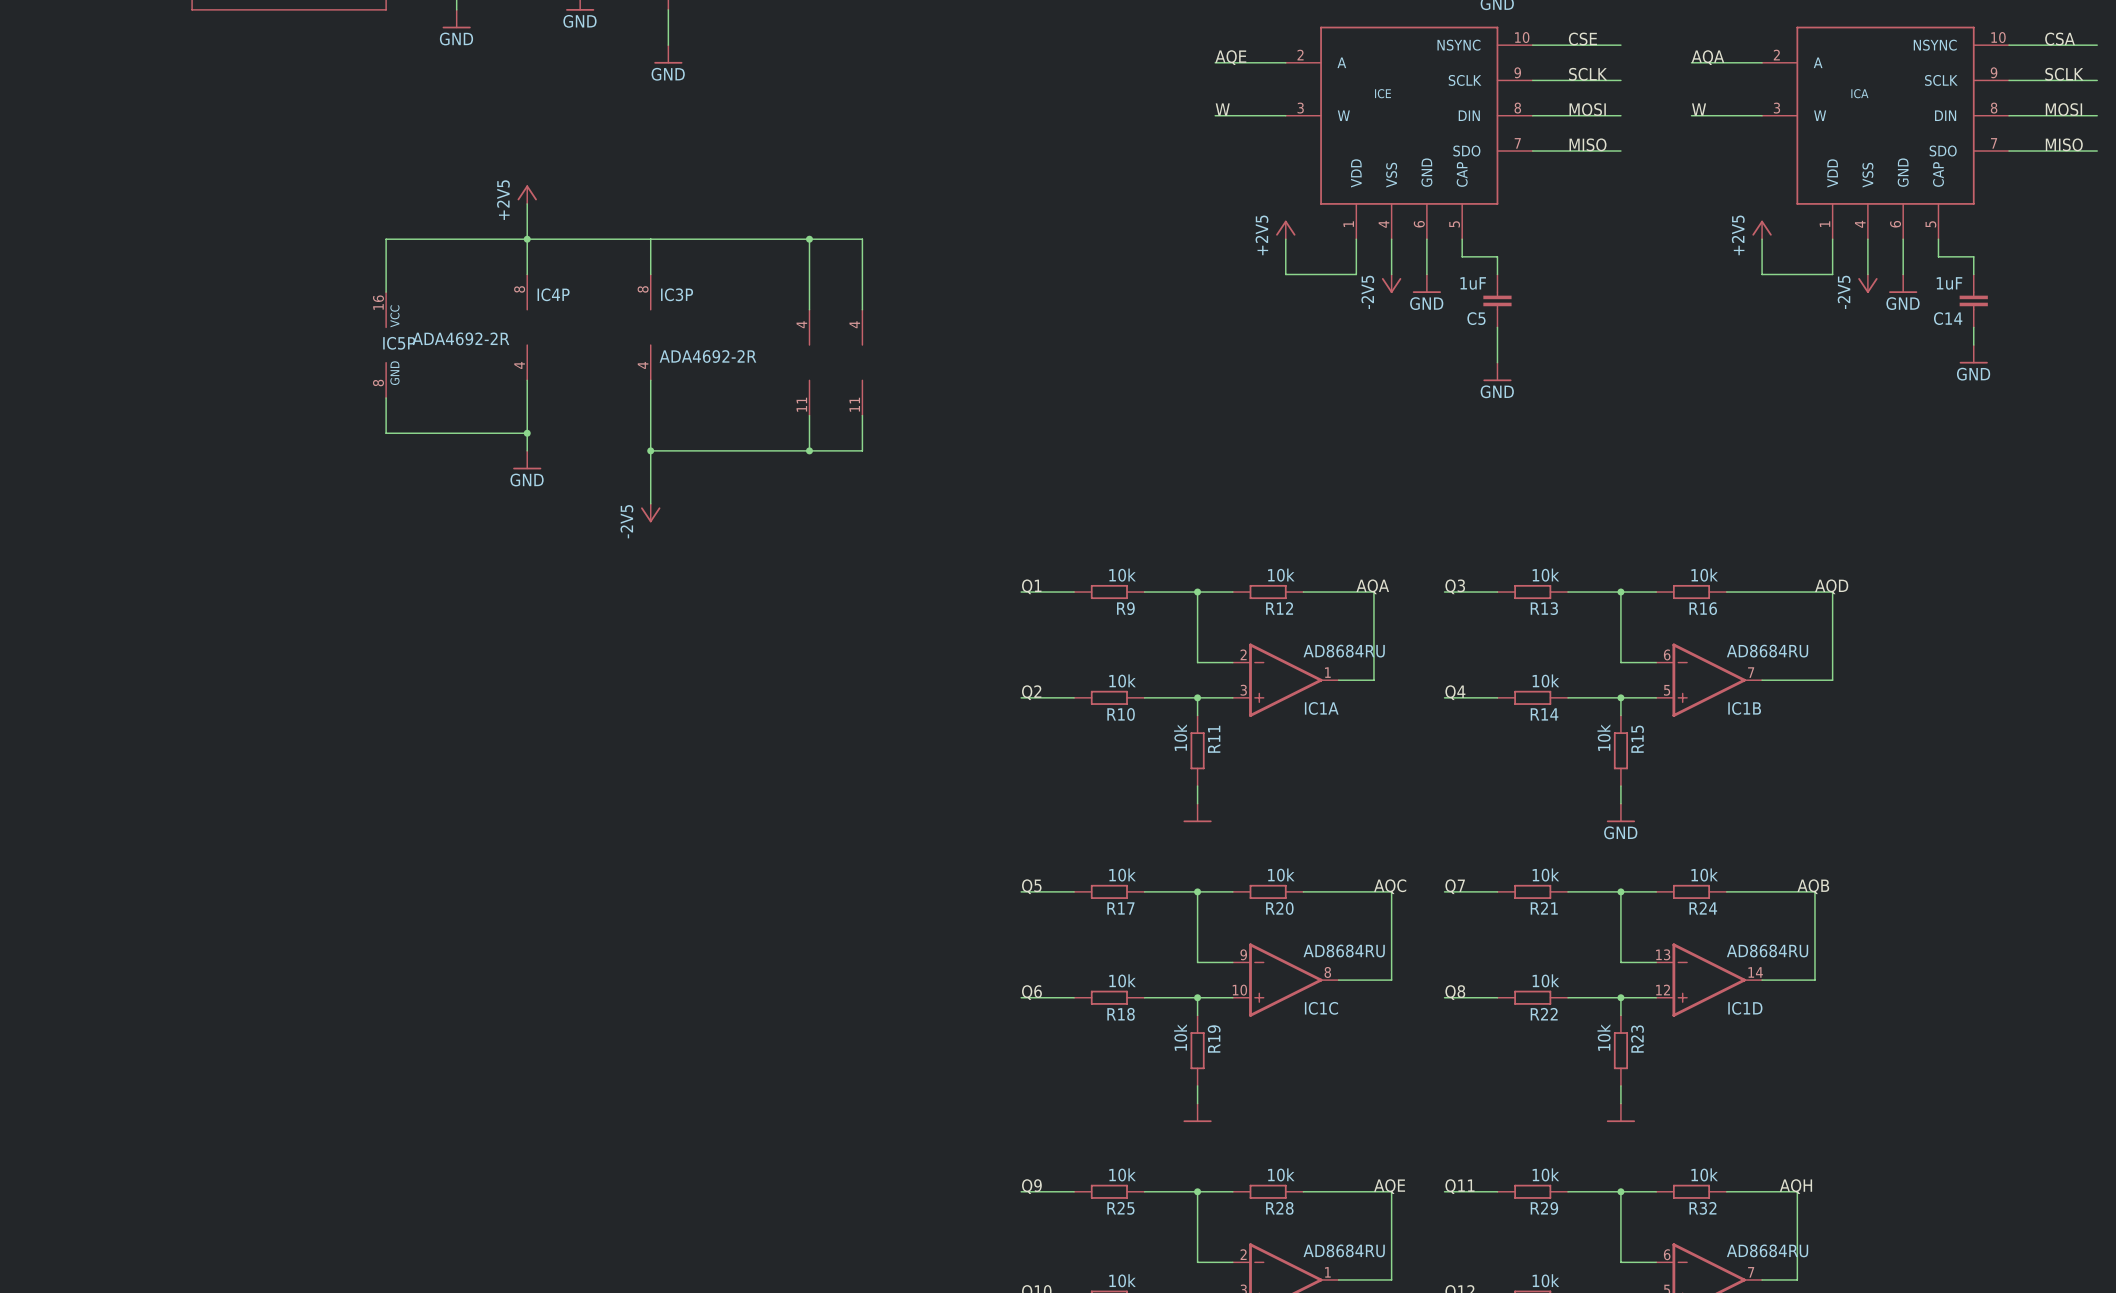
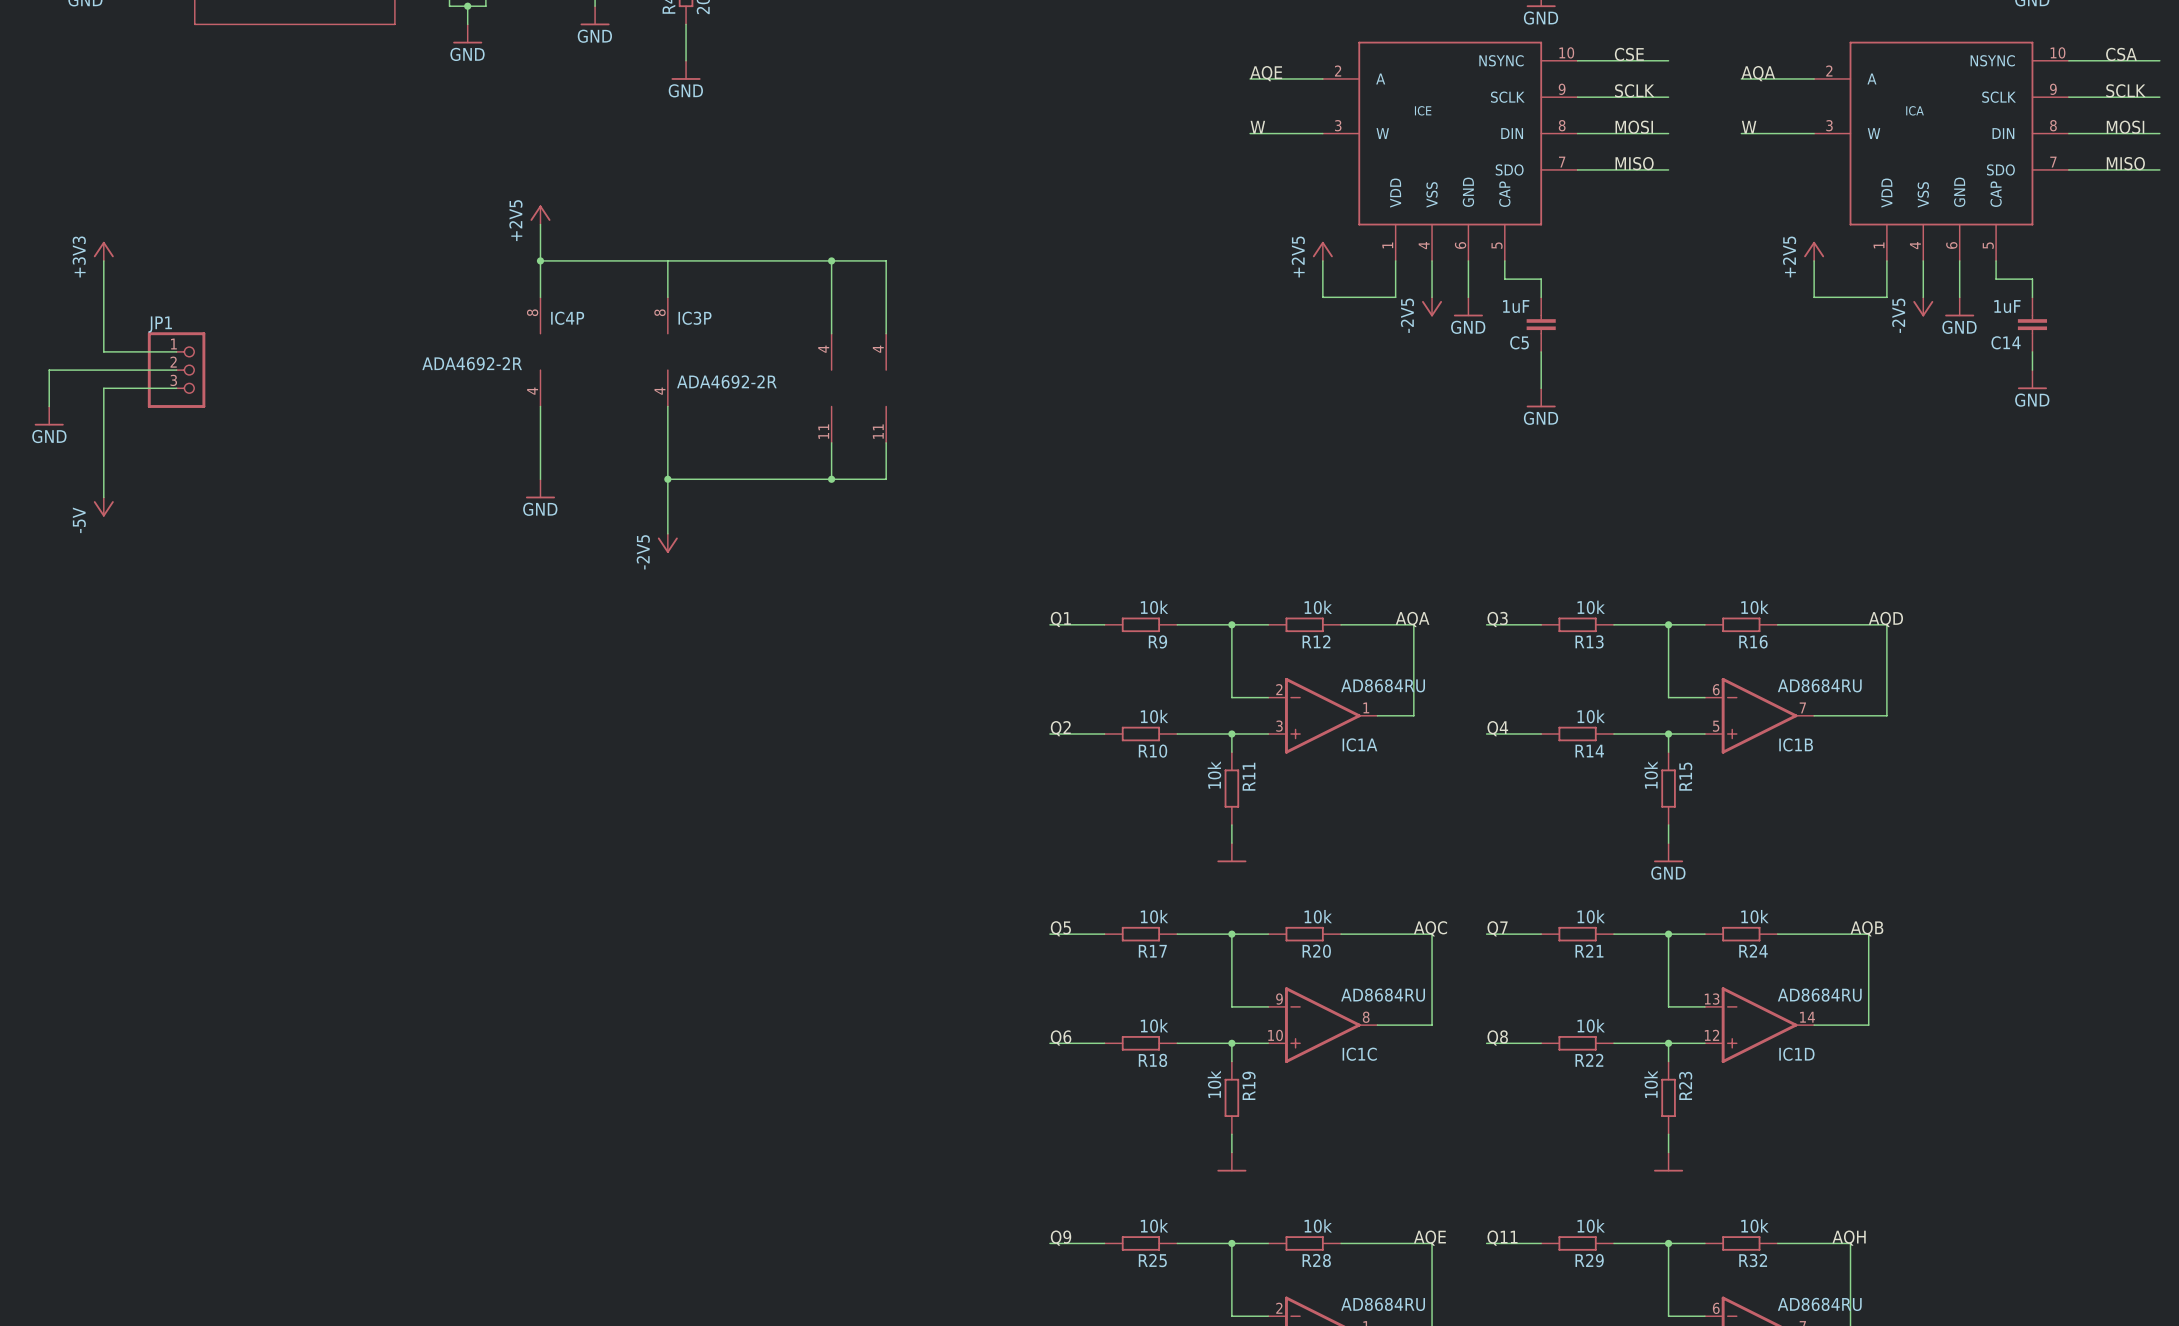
power symbol: none -> +3V3 (103, 251)
wire: none -> (103, 260) (103, 351) (176, 351)
wire: (527, 239) (386, 239) (386, 292) -> none
wire: none -> (176, 370) (49, 370) (49, 406)
JP1: none -> (176, 370)
IC5P: (386, 345) -> none
wire: none -> (176, 388) (103, 388) (103, 497)
power symbol: none -> GND (49, 416)
wire: (386, 397) (386, 433) (527, 433) -> none
junction: (527, 433) -> none
power symbol: none -> -5V (103, 507)

